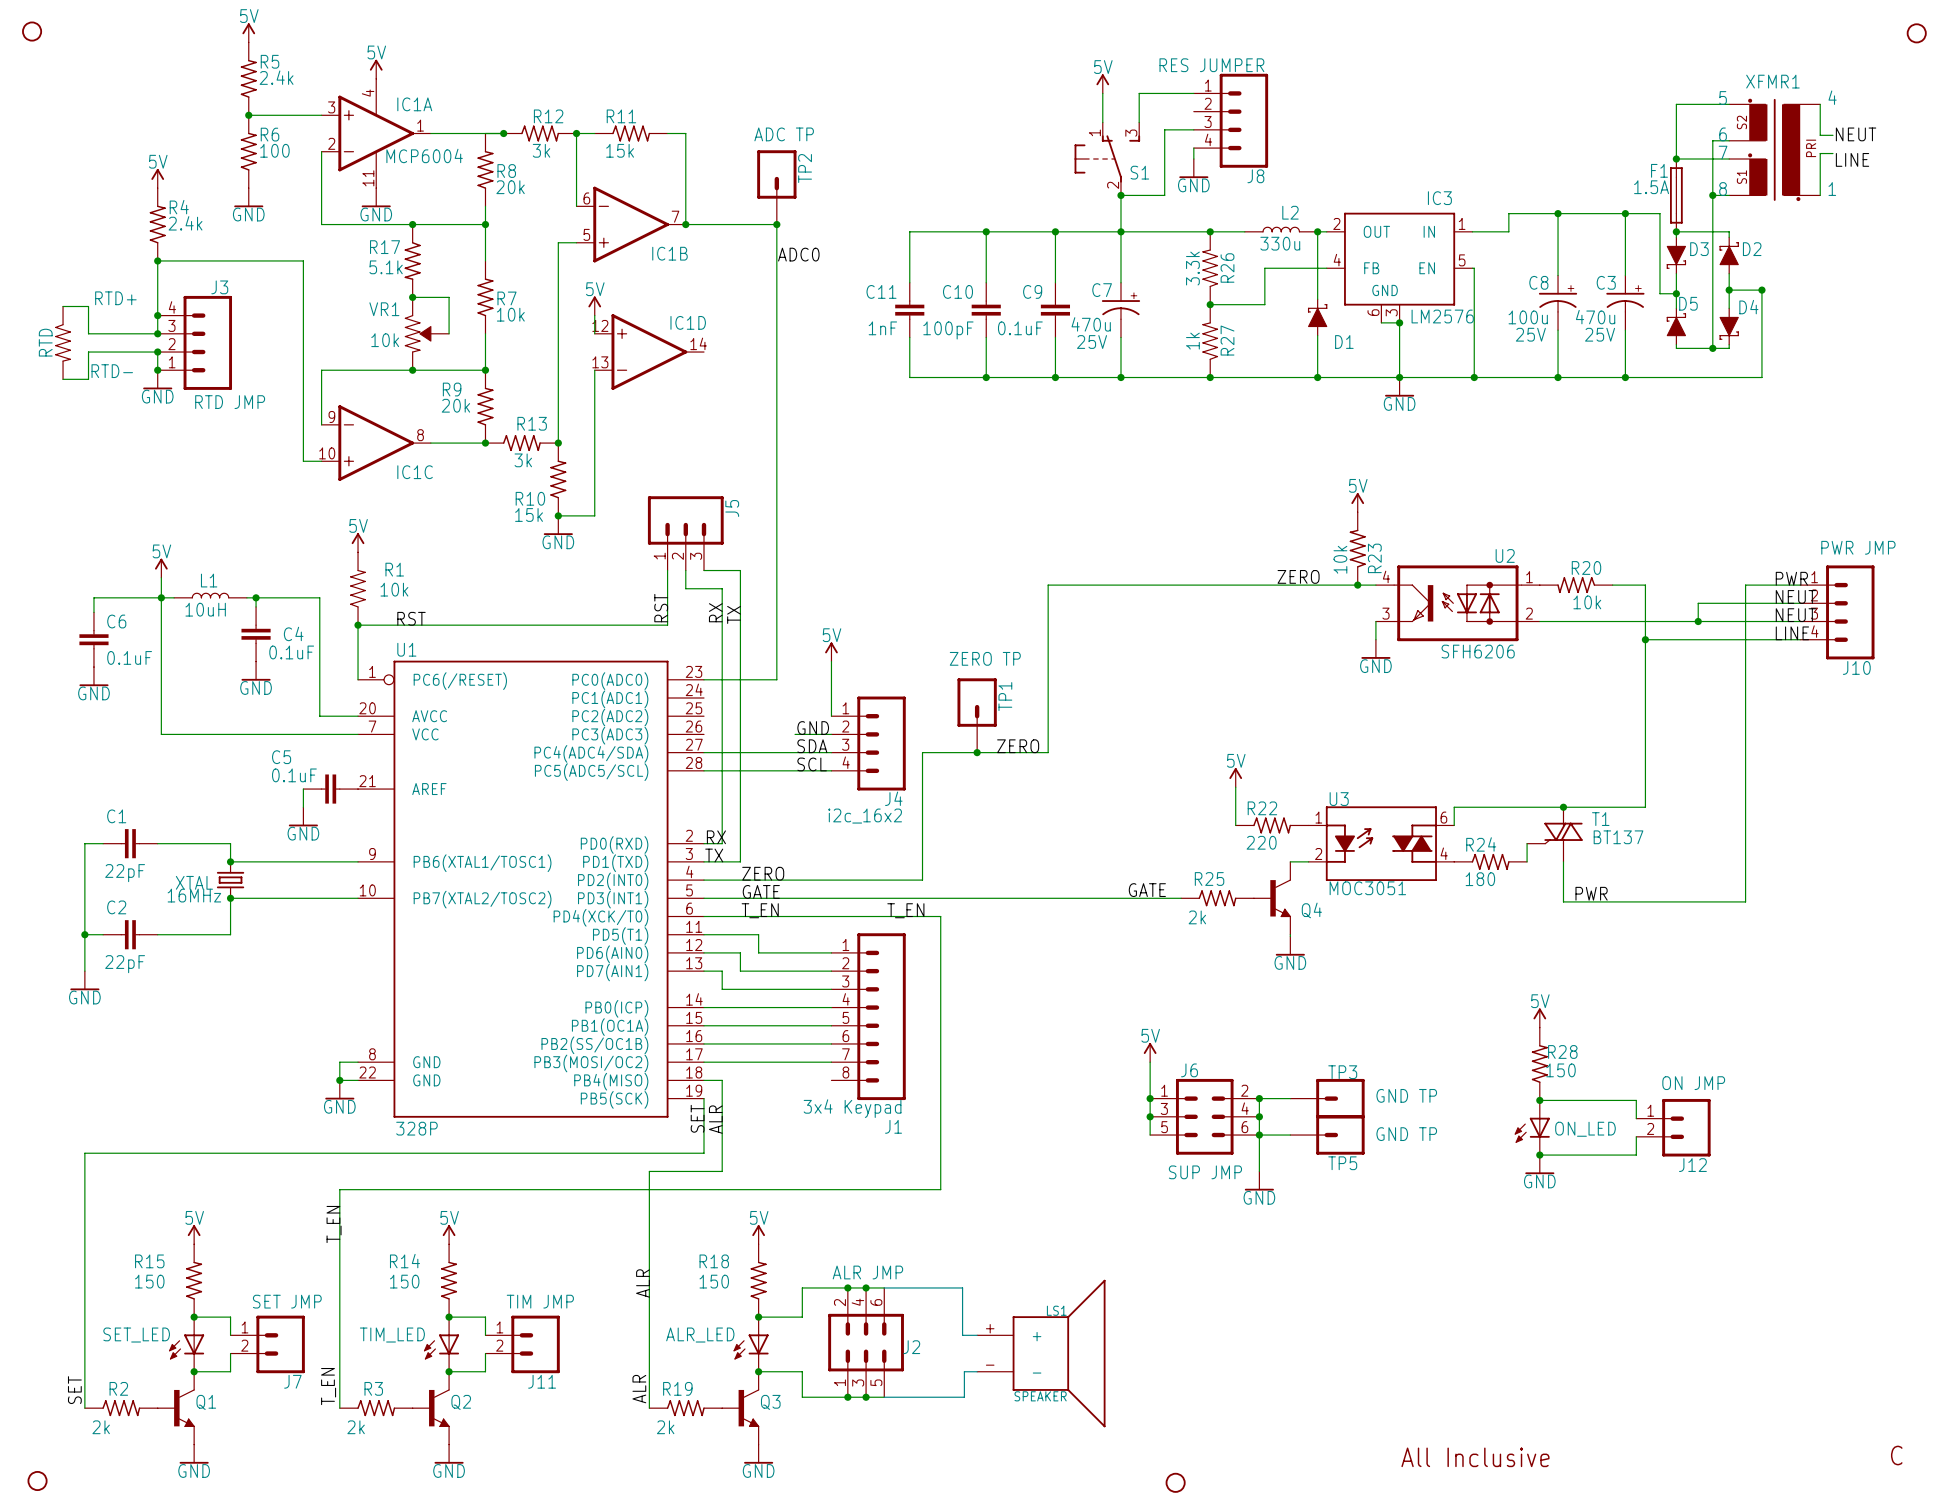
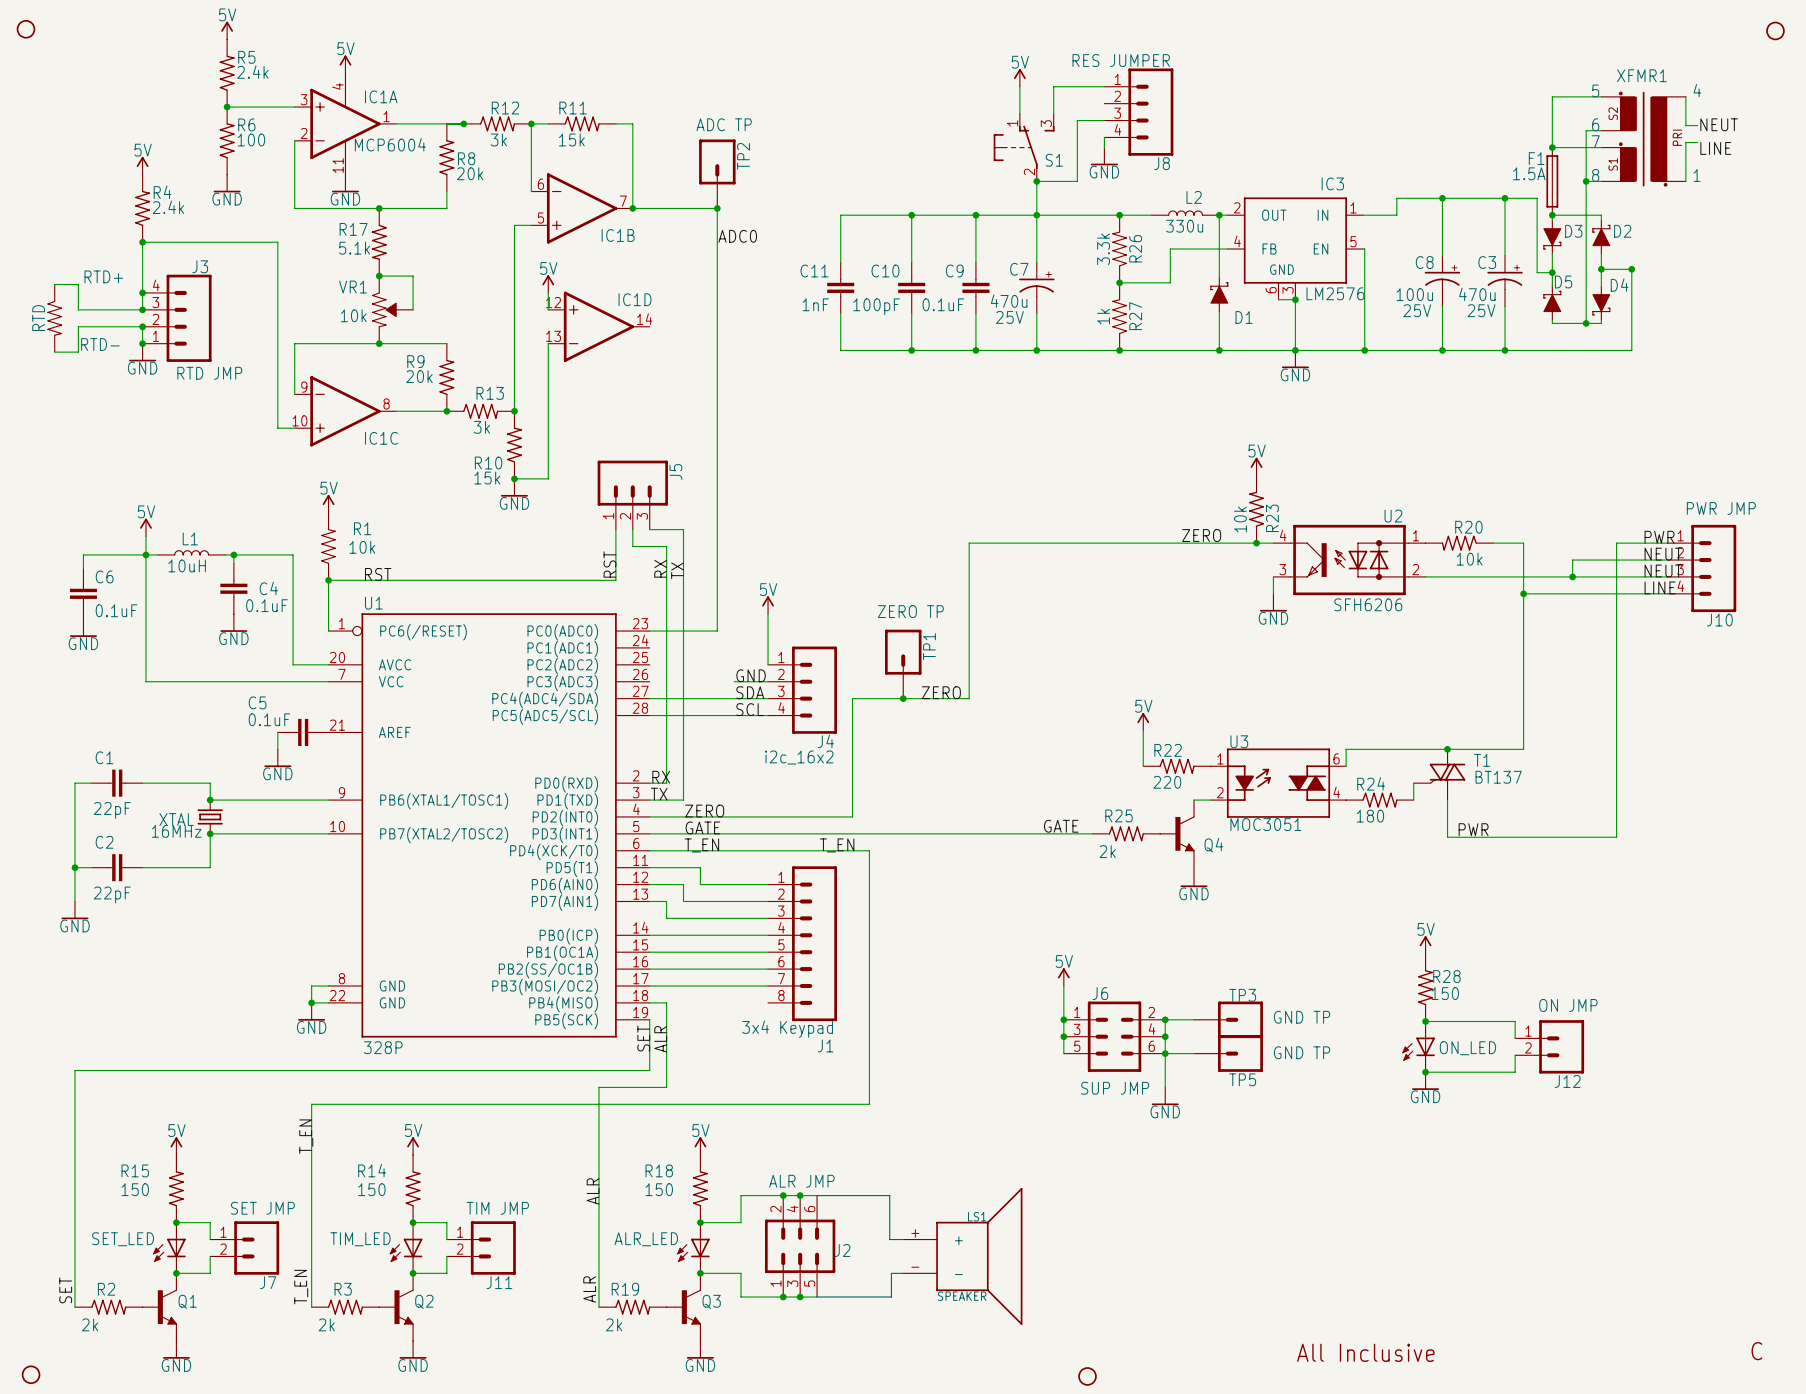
wire: (485, 224) (485, 260) -> none
junction: (485, 224) -> none
R7: 10k (485, 297) -> none
wire: (485, 333) (485, 370) -> none
junction: (485, 370) -> none

